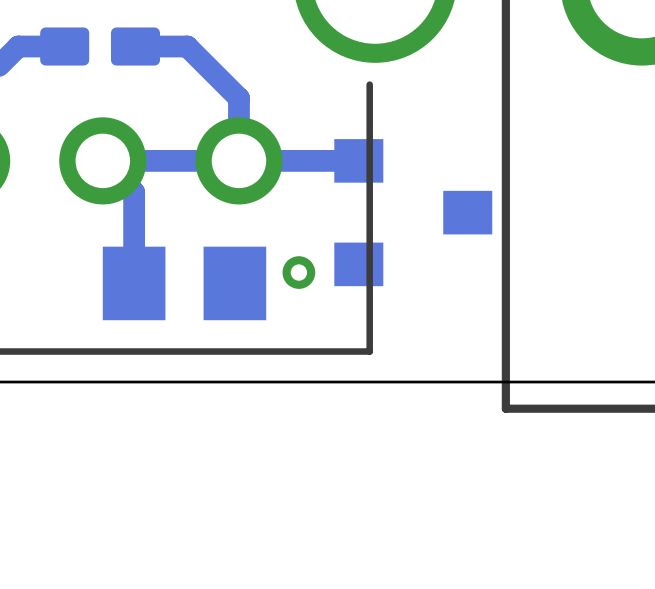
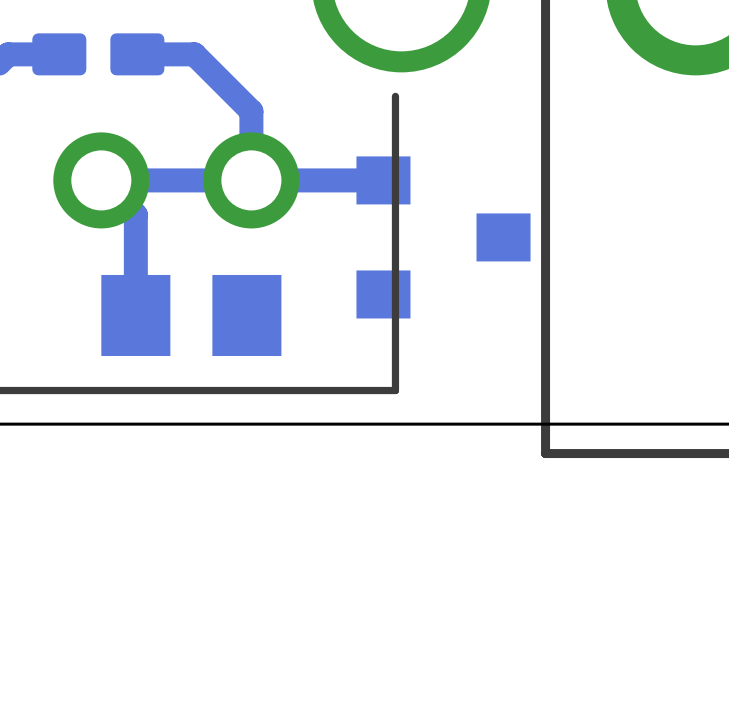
via: (298, 272) -> none

